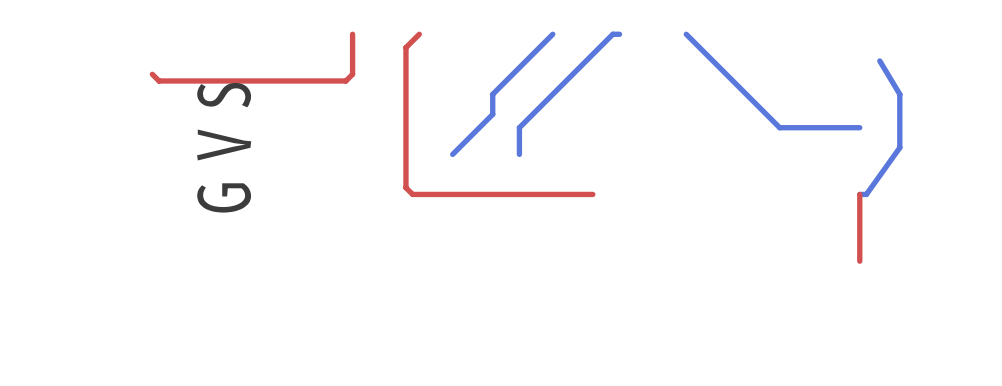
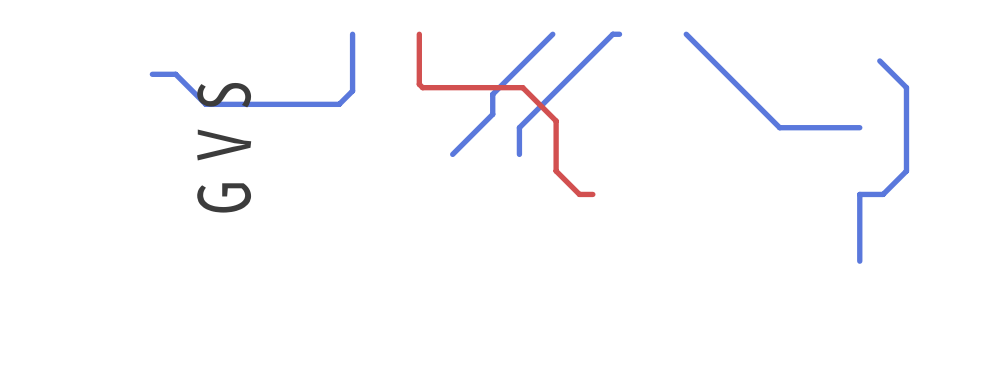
top track: (352, 34) (352, 74) (345, 80) (159, 80) (152, 74) -> none
bottom track: none -> (352, 34) (352, 91) (339, 104) (205, 104) (175, 74) (152, 74)
top track: (419, 34) (405, 47) (405, 187) (412, 194) (579, 194) -> (419, 34) (419, 84) (422, 87) (522, 87) (556, 121) (556, 171) (579, 194)
bottom track: (879, 60) (899, 94) (899, 147) (866, 194) -> (879, 60) (906, 87) (906, 171) (883, 194) (866, 194)
top track: (859, 194) (859, 261) -> none
bottom track: none -> (859, 194) (859, 261)

